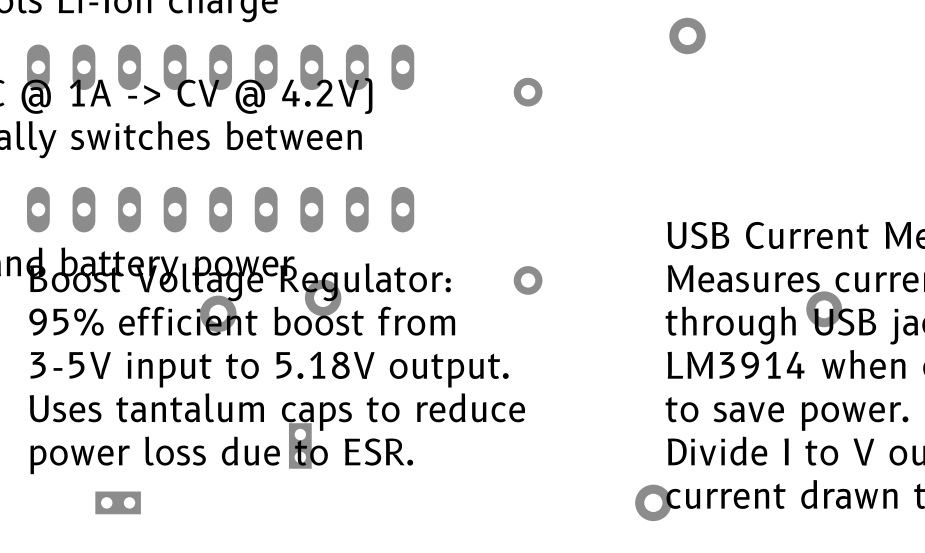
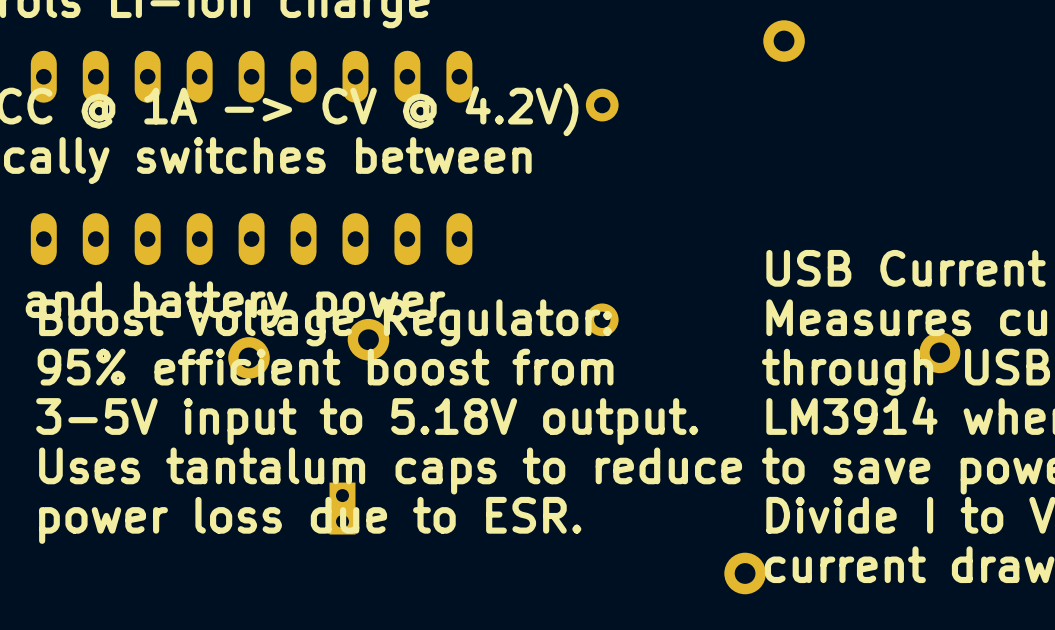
part: (118, 502) -> none

